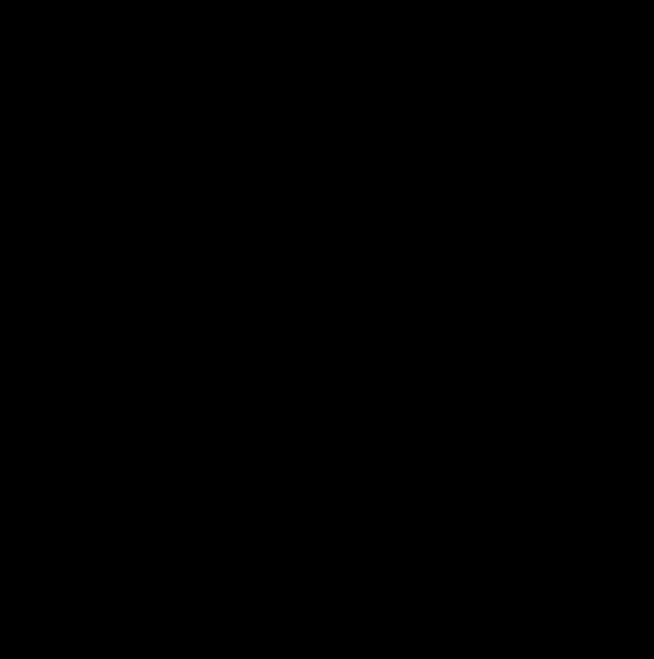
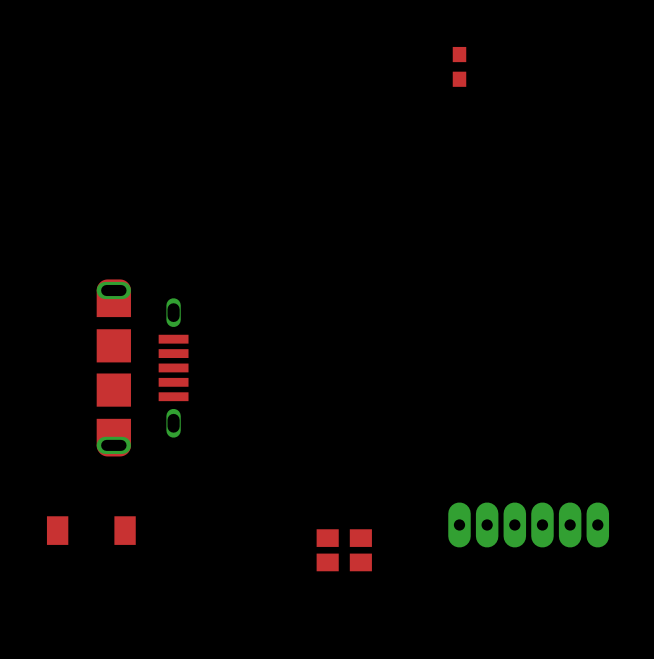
part: none -> (459, 66)
part: none -> (142, 367)
part: none -> (528, 524)
part: none -> (91, 530)
part: none -> (344, 550)

